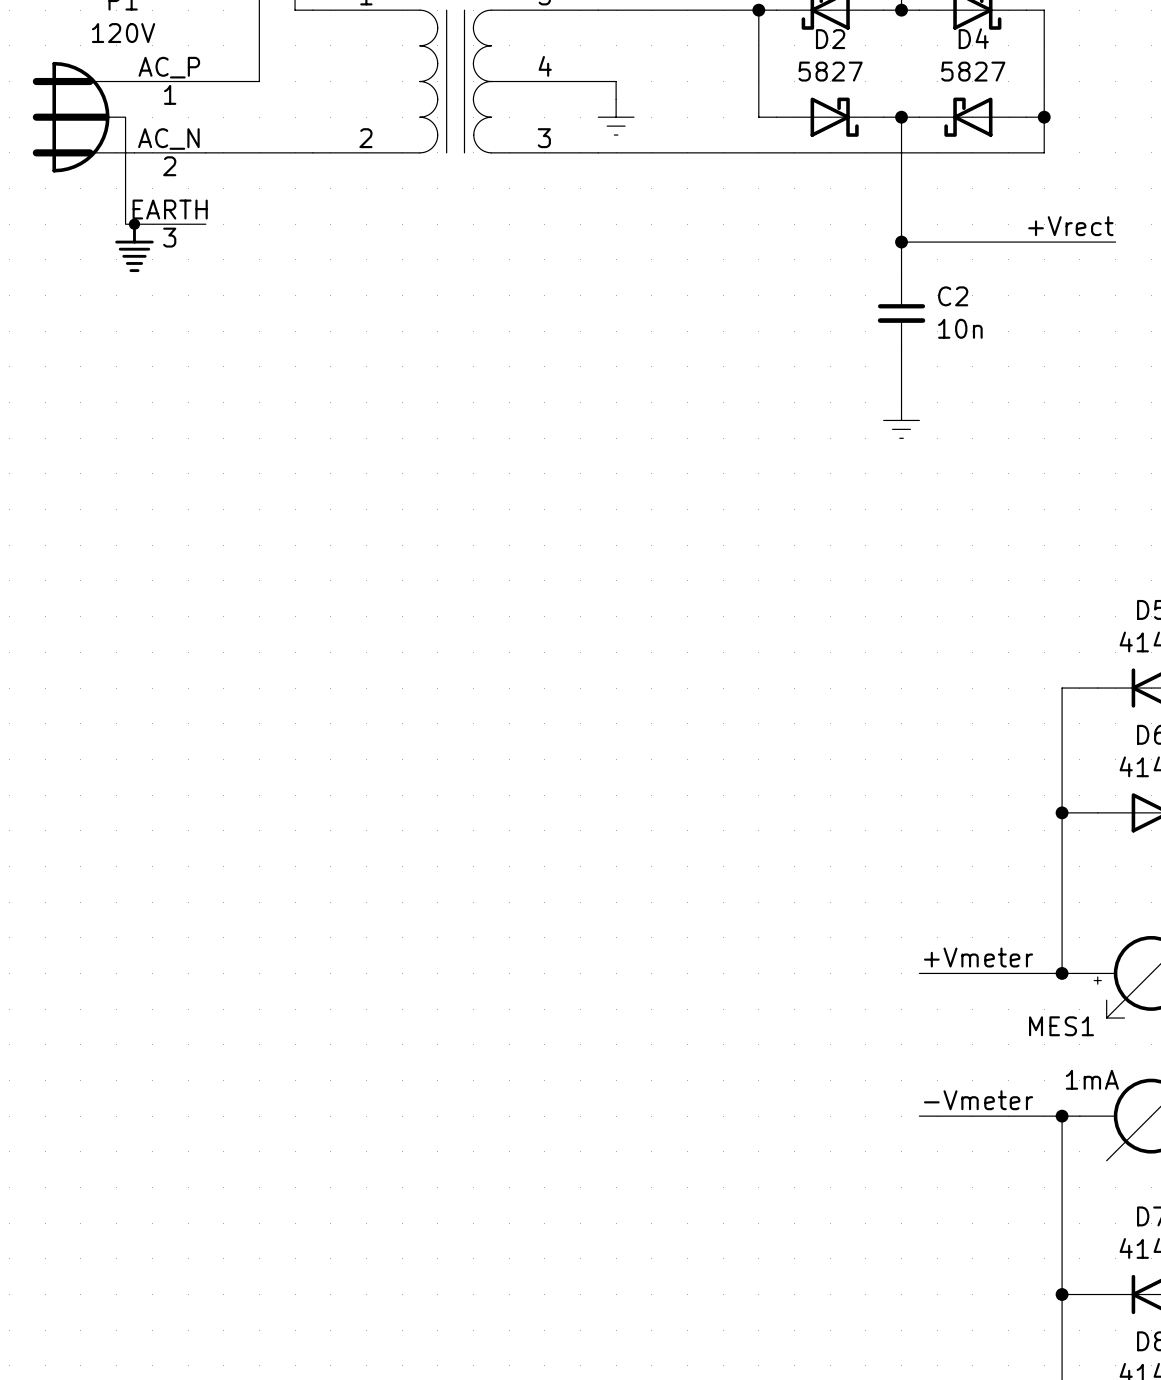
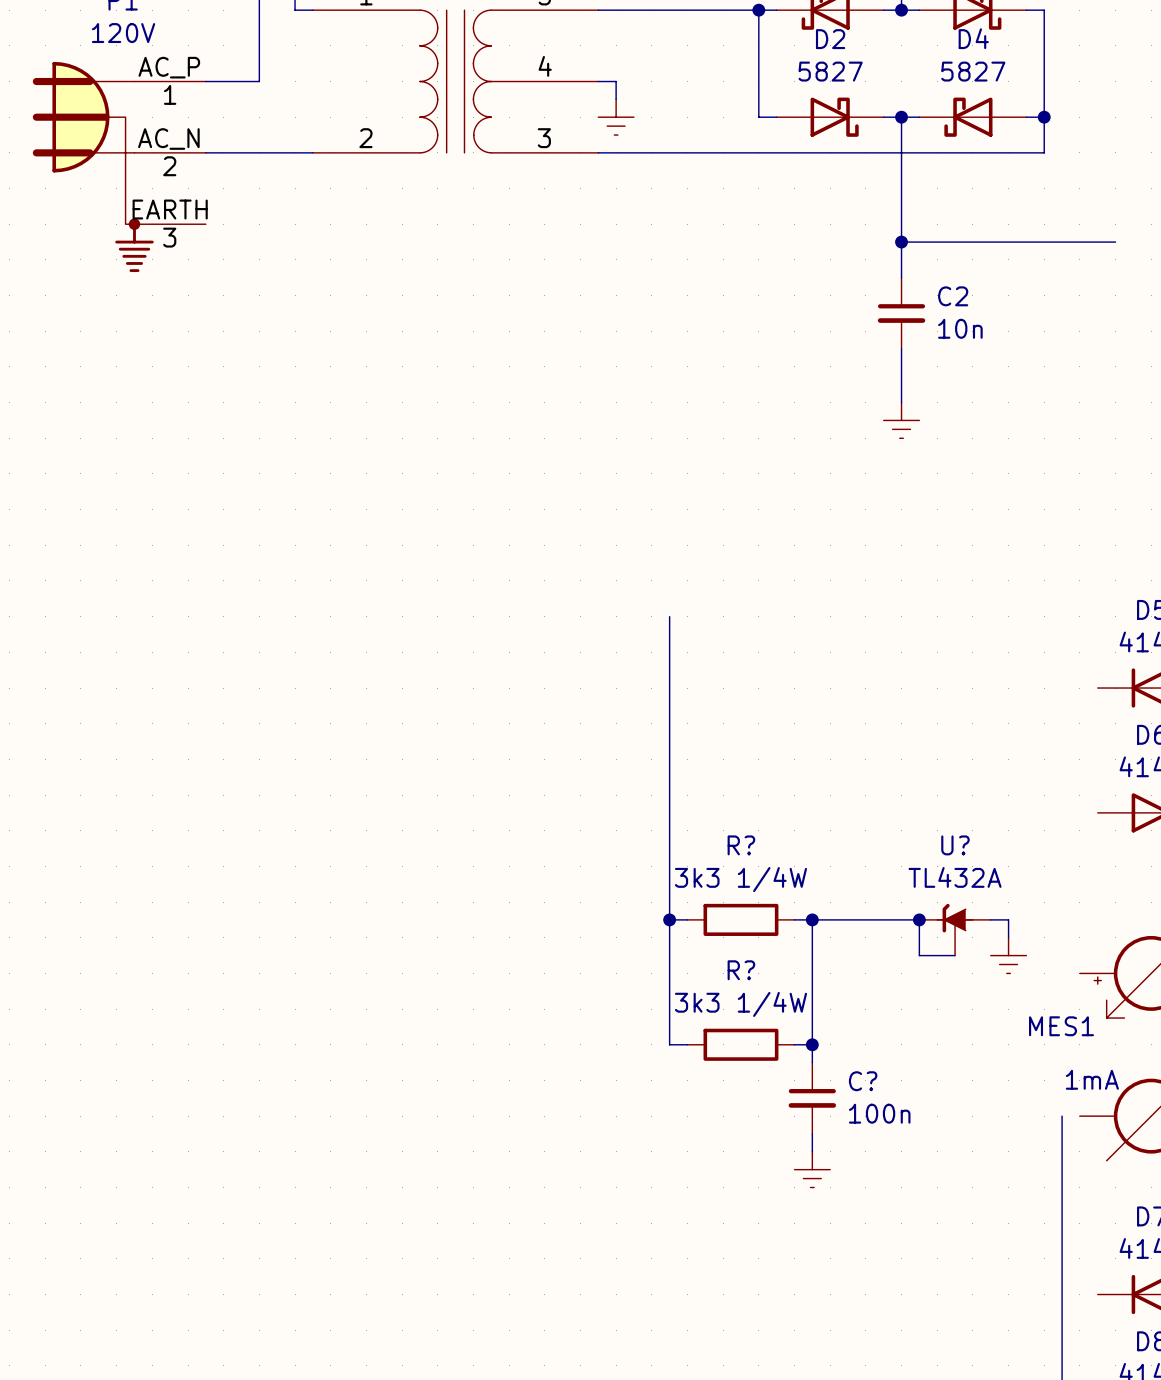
label: +Vrect (1070, 226) -> none
wire: none -> (669, 616) (669, 1044) (687, 1044)
wire: (1097, 688) (1062, 688) (1062, 973) -> none
wire: (1062, 812) (1097, 812) -> none
junction: (1062, 812) -> none
wire: none -> (669, 919) (687, 919)
junction: none -> (669, 919)
R?: none -> 3k3 1/4W (740, 919)
wire: none -> (794, 919) (919, 919) (919, 955) (955, 955)
wire: none -> (812, 919) (812, 1062)
junction: none -> (812, 919)
junction: none -> (919, 919)
wire: none -> (990, 919) (1008, 919) (1008, 937)
U?: none -> TL432A (955, 929)
power symbol: none -> (1008, 955)
label: +Vmeter (978, 957) -> none
wire: (919, 973) (1079, 973) -> none
junction: (1062, 973) -> none
R?: none -> 3k3 1/4W (740, 1044)
wire: none -> (794, 1044) (812, 1044)
junction: none -> (812, 1044)
C?: none -> 100n (812, 1098)
label: -Vmeter (978, 1100) -> none
wire: (919, 1116) (1079, 1116) -> none
junction: (1062, 1116) -> none
wire: none -> (812, 1133) (812, 1151)
power symbol: none -> (812, 1169)
wire: (1062, 1294) (1097, 1294) -> none
junction: (1062, 1294) -> none

